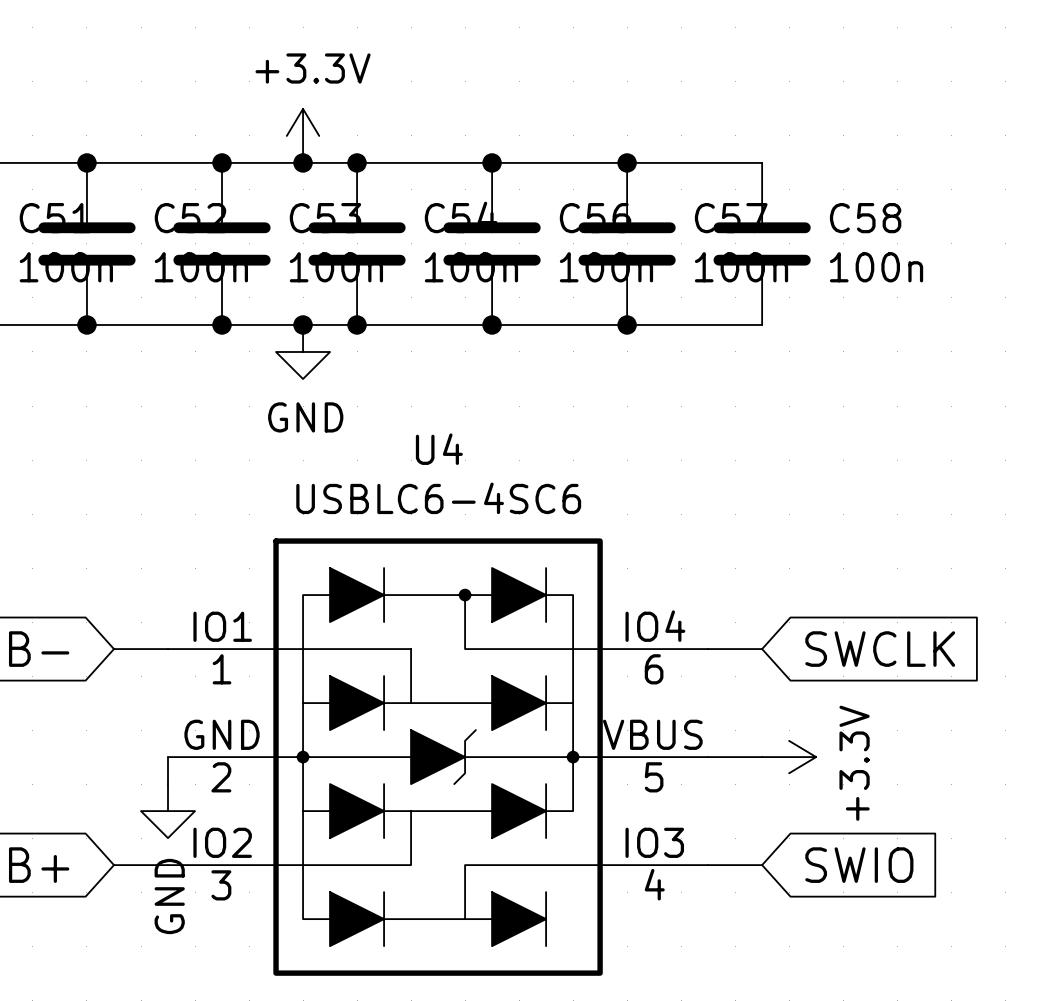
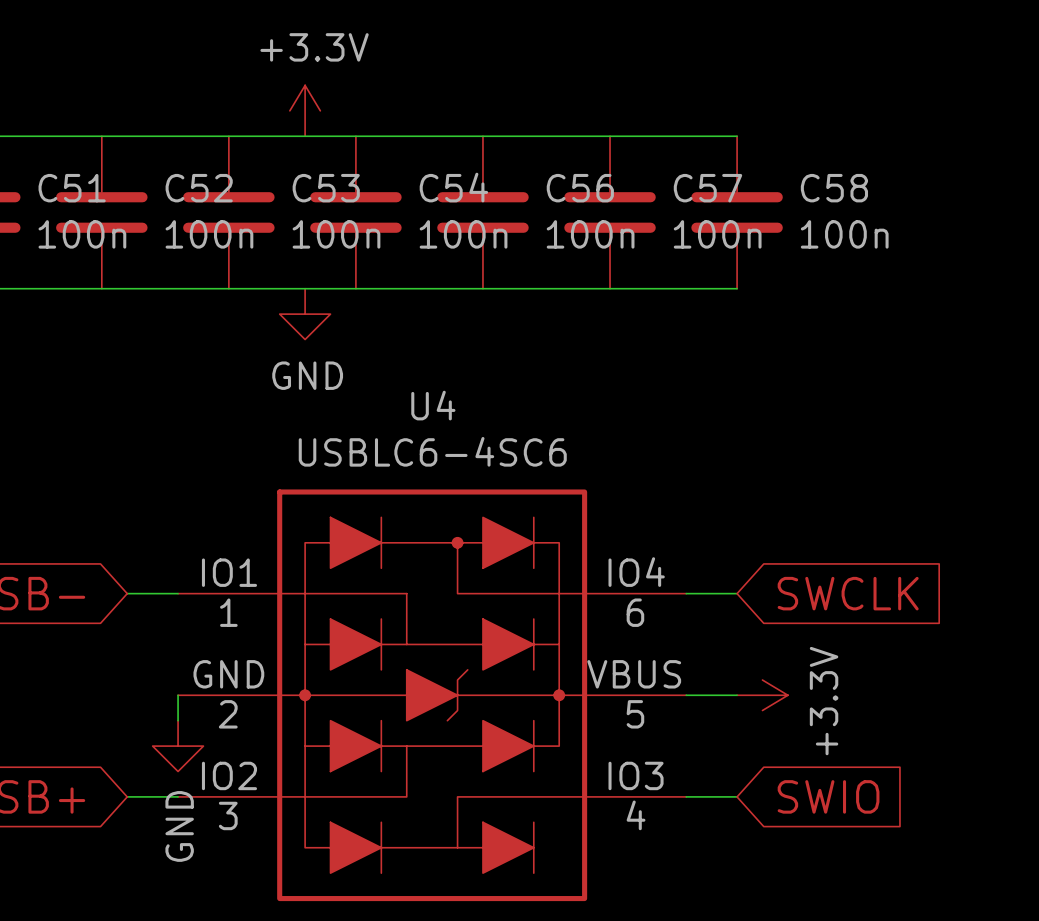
junction: (86, 162) -> none
junction: (222, 162) -> none
junction: (303, 162) -> none
junction: (357, 162) -> none
junction: (492, 162) -> none
junction: (627, 162) -> none
junction: (86, 324) -> none
junction: (222, 324) -> none
junction: (303, 324) -> none
junction: (357, 324) -> none
junction: (492, 324) -> none
junction: (627, 324) -> none

